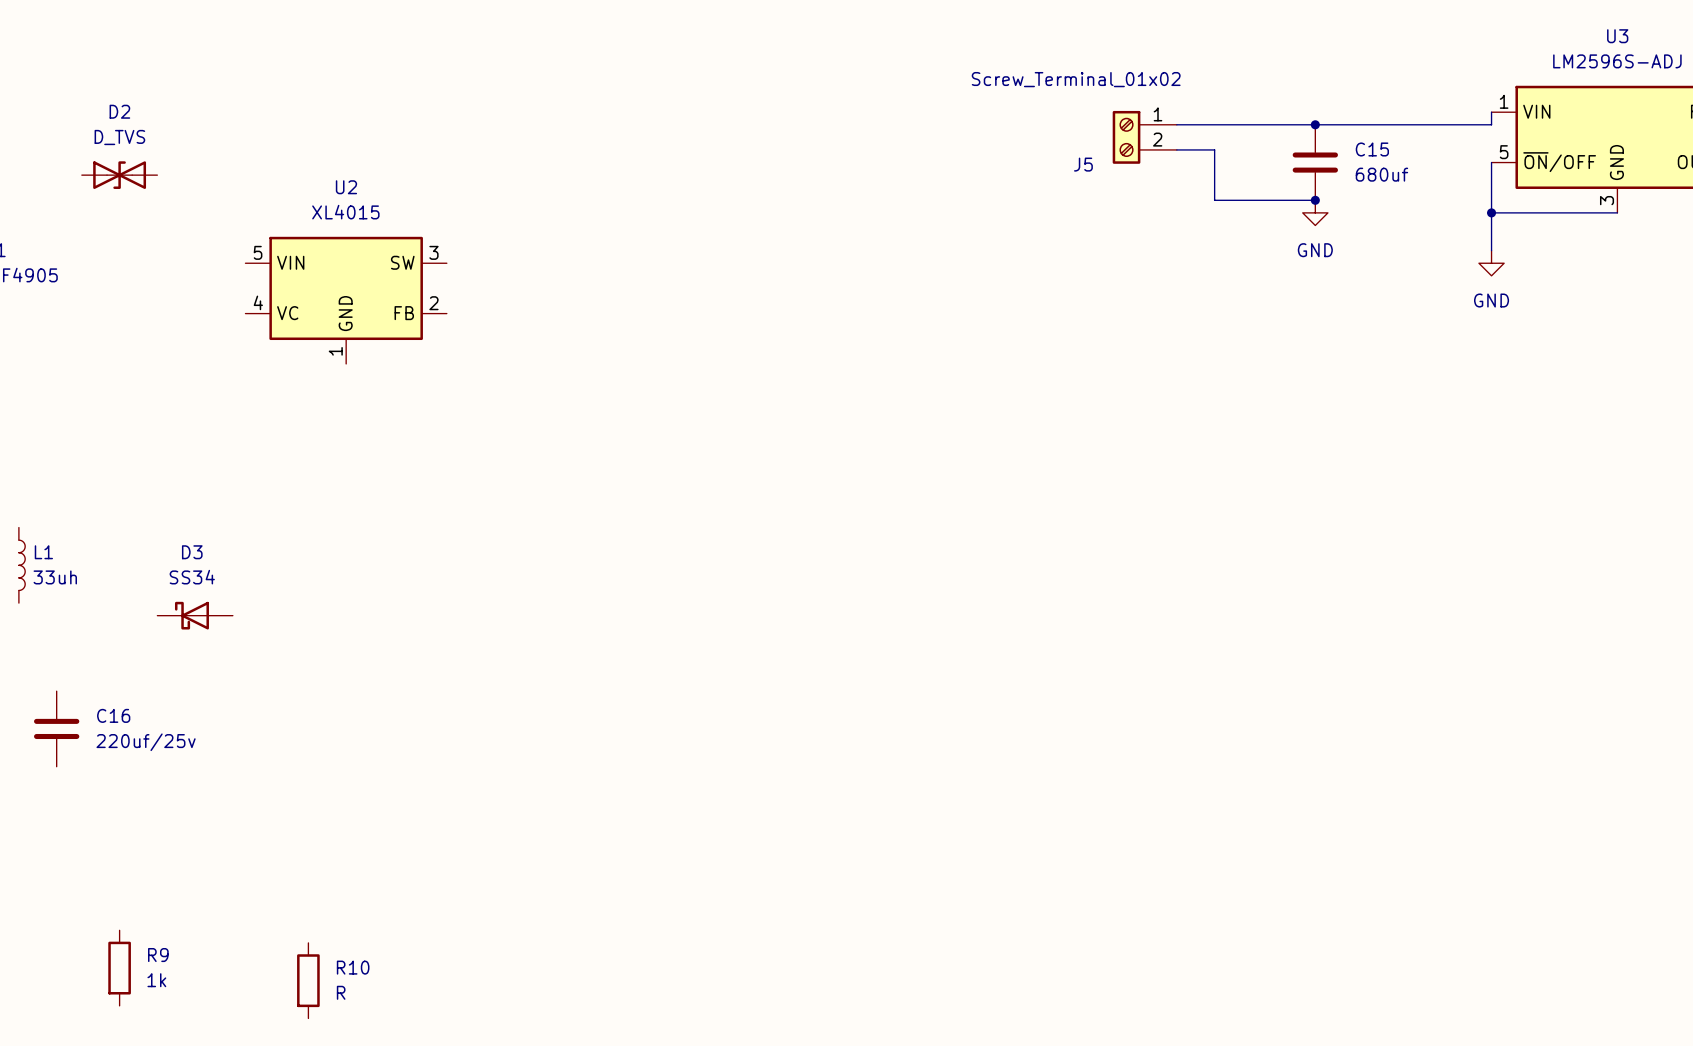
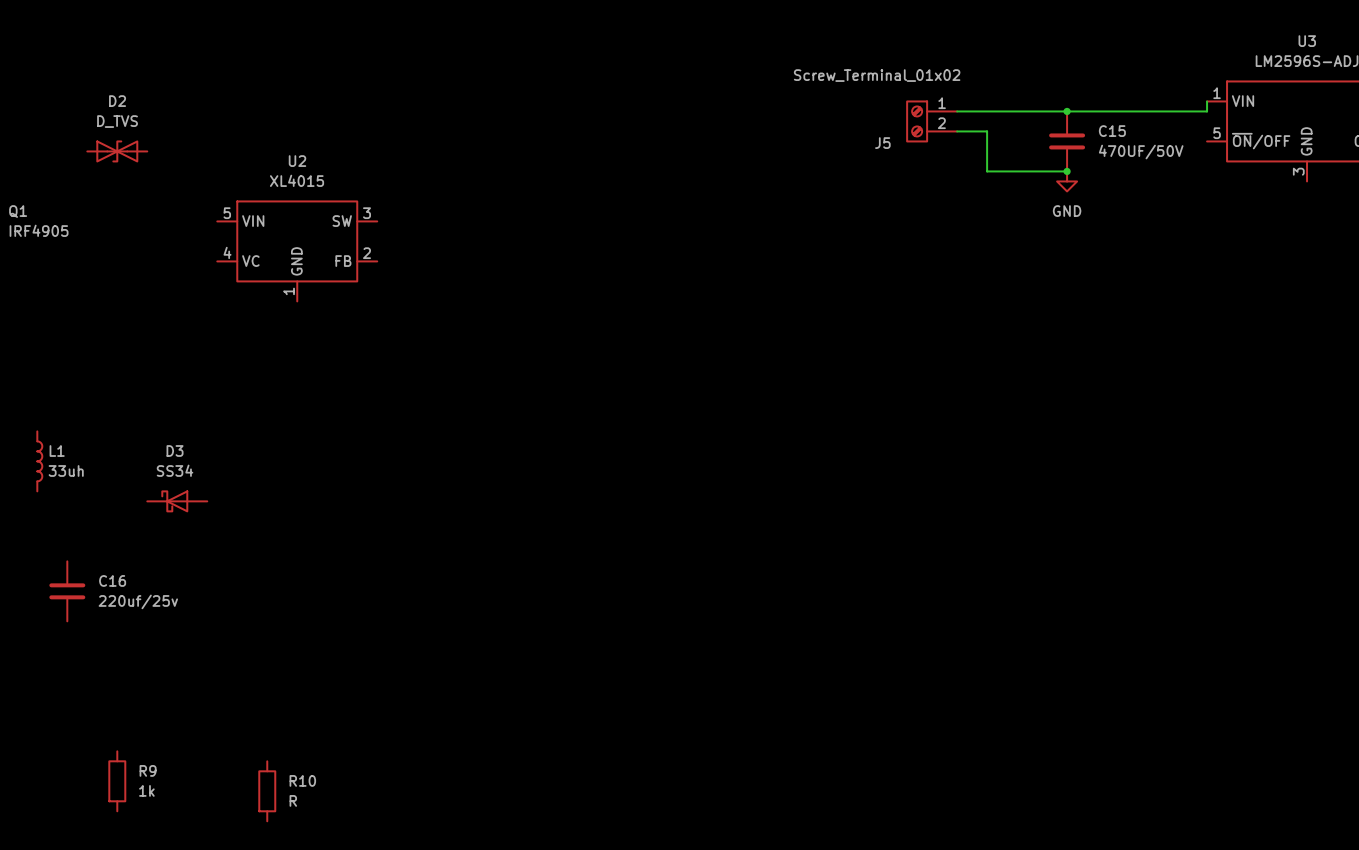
wire: (1491, 162) (1491, 250) -> none
C15 value: 680uf (1381, 174) -> 470UF/50V (1141, 152)
wire: (1491, 212) (1617, 212) -> none
junction: (1491, 212) -> none
power symbol: GND (1491, 263) -> none

